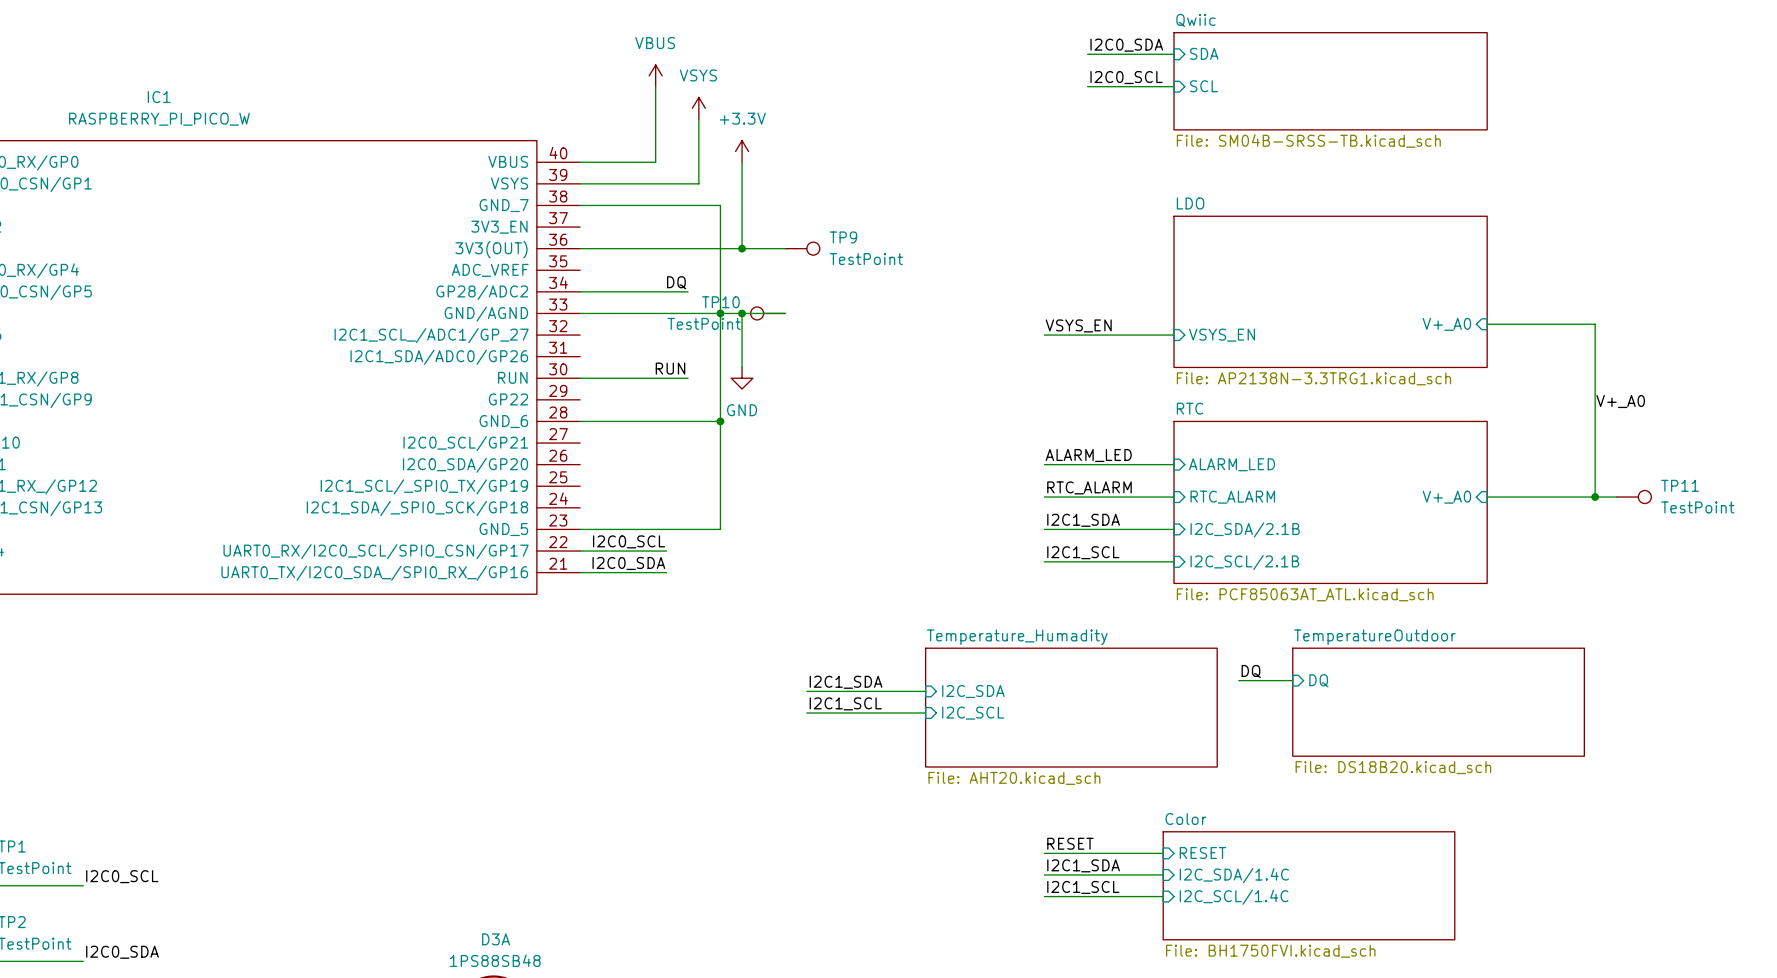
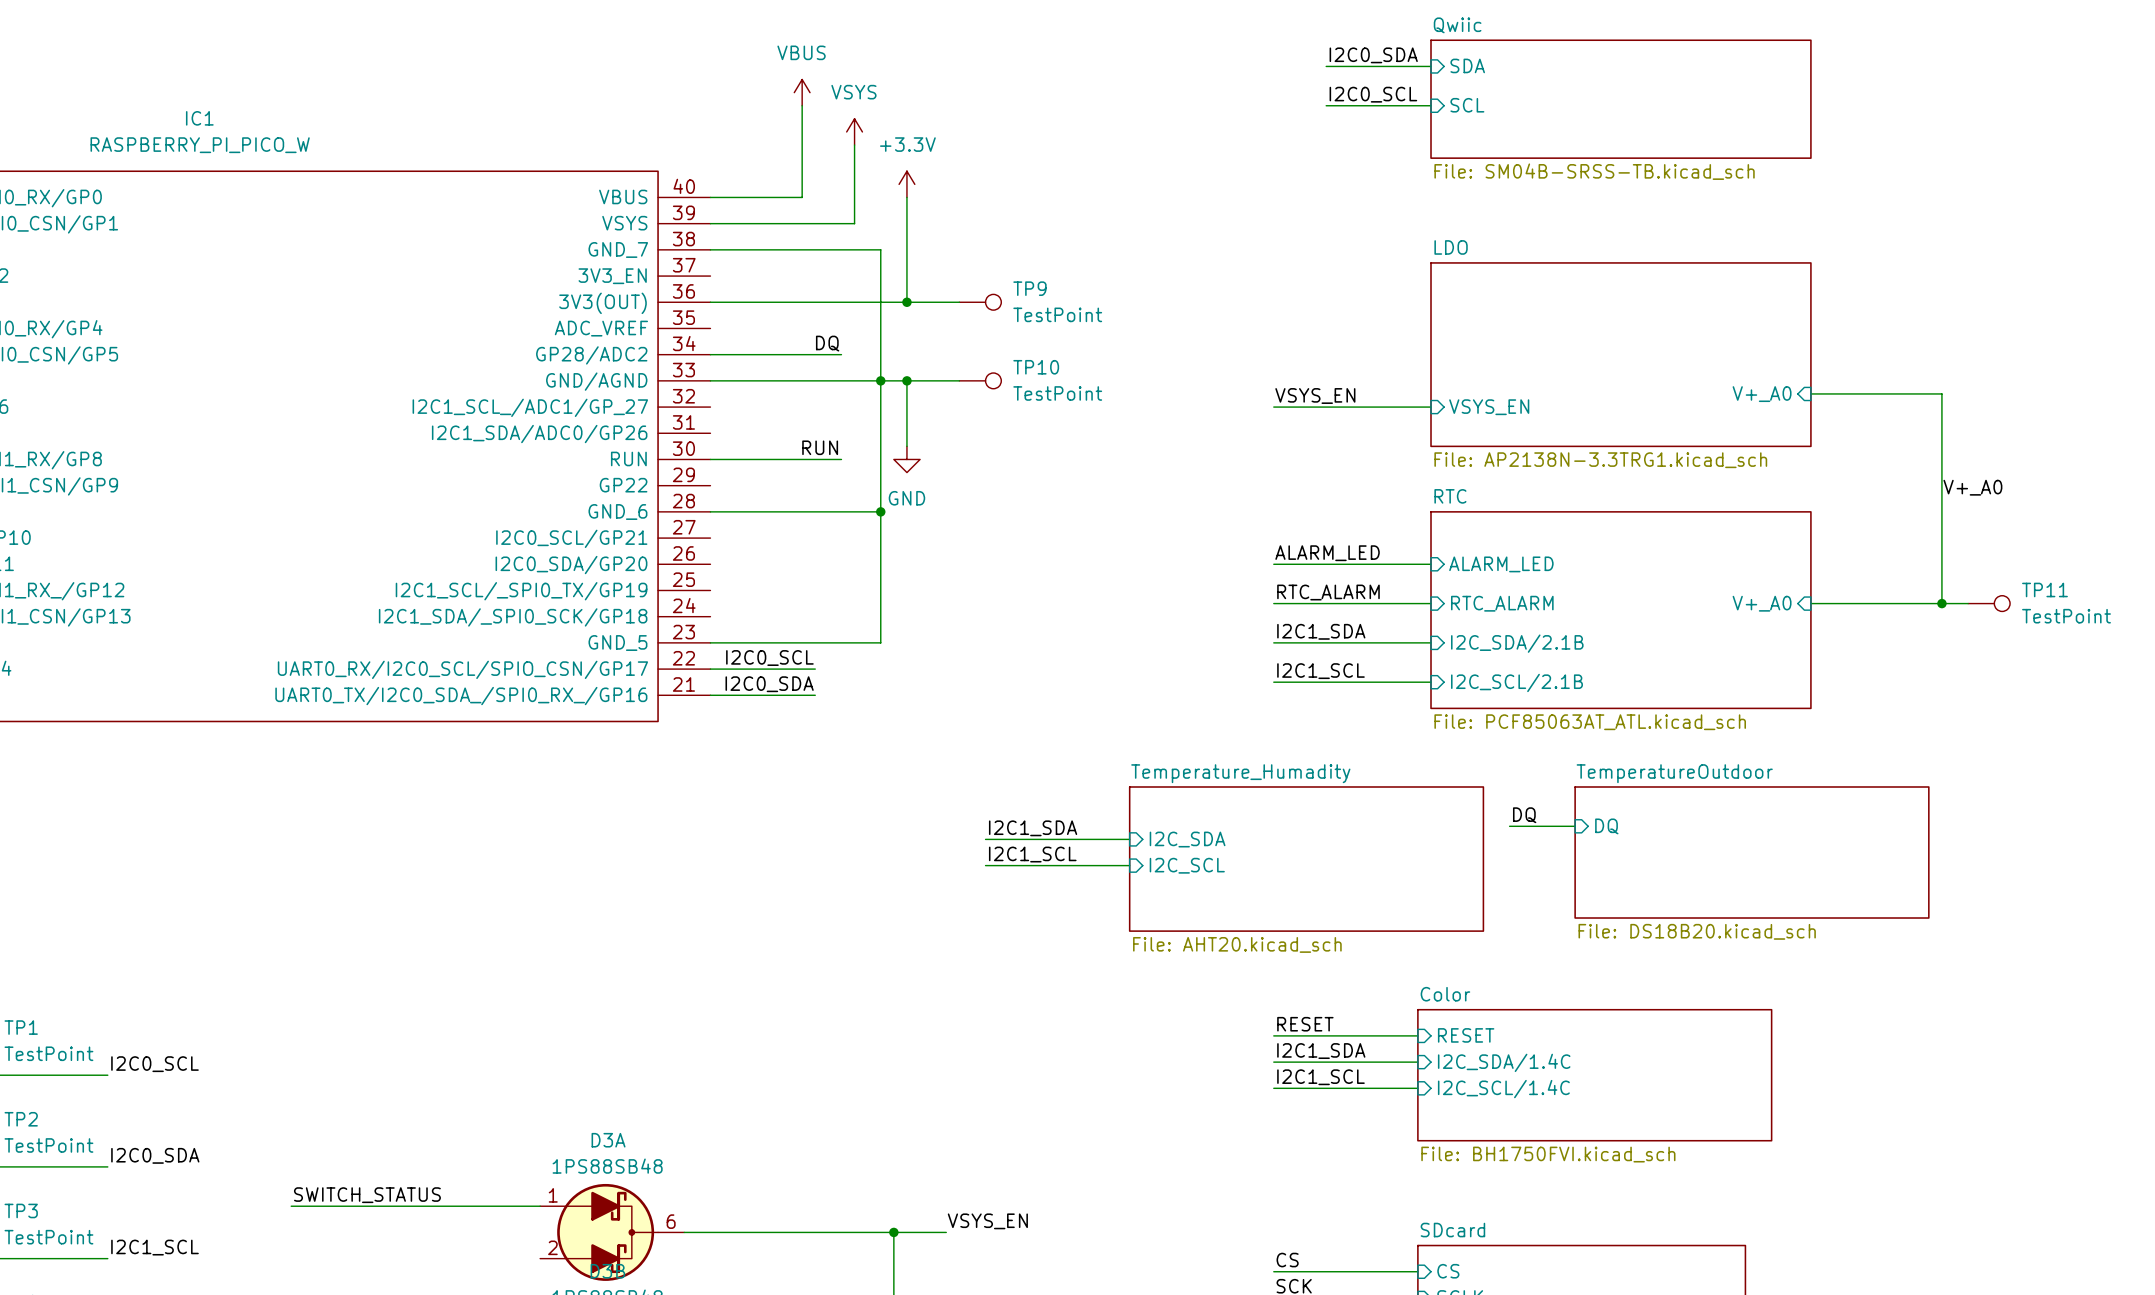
TP10 name position: TP10 (720, 302) -> TP10 (1036, 367)
TP10 rotation: 0° (757, 313) -> 180° (993, 380)
TP10 position: (767, 313) -> (980, 380)
TP10 value position: TestPoint (704, 323) -> TestPoint (1057, 393)

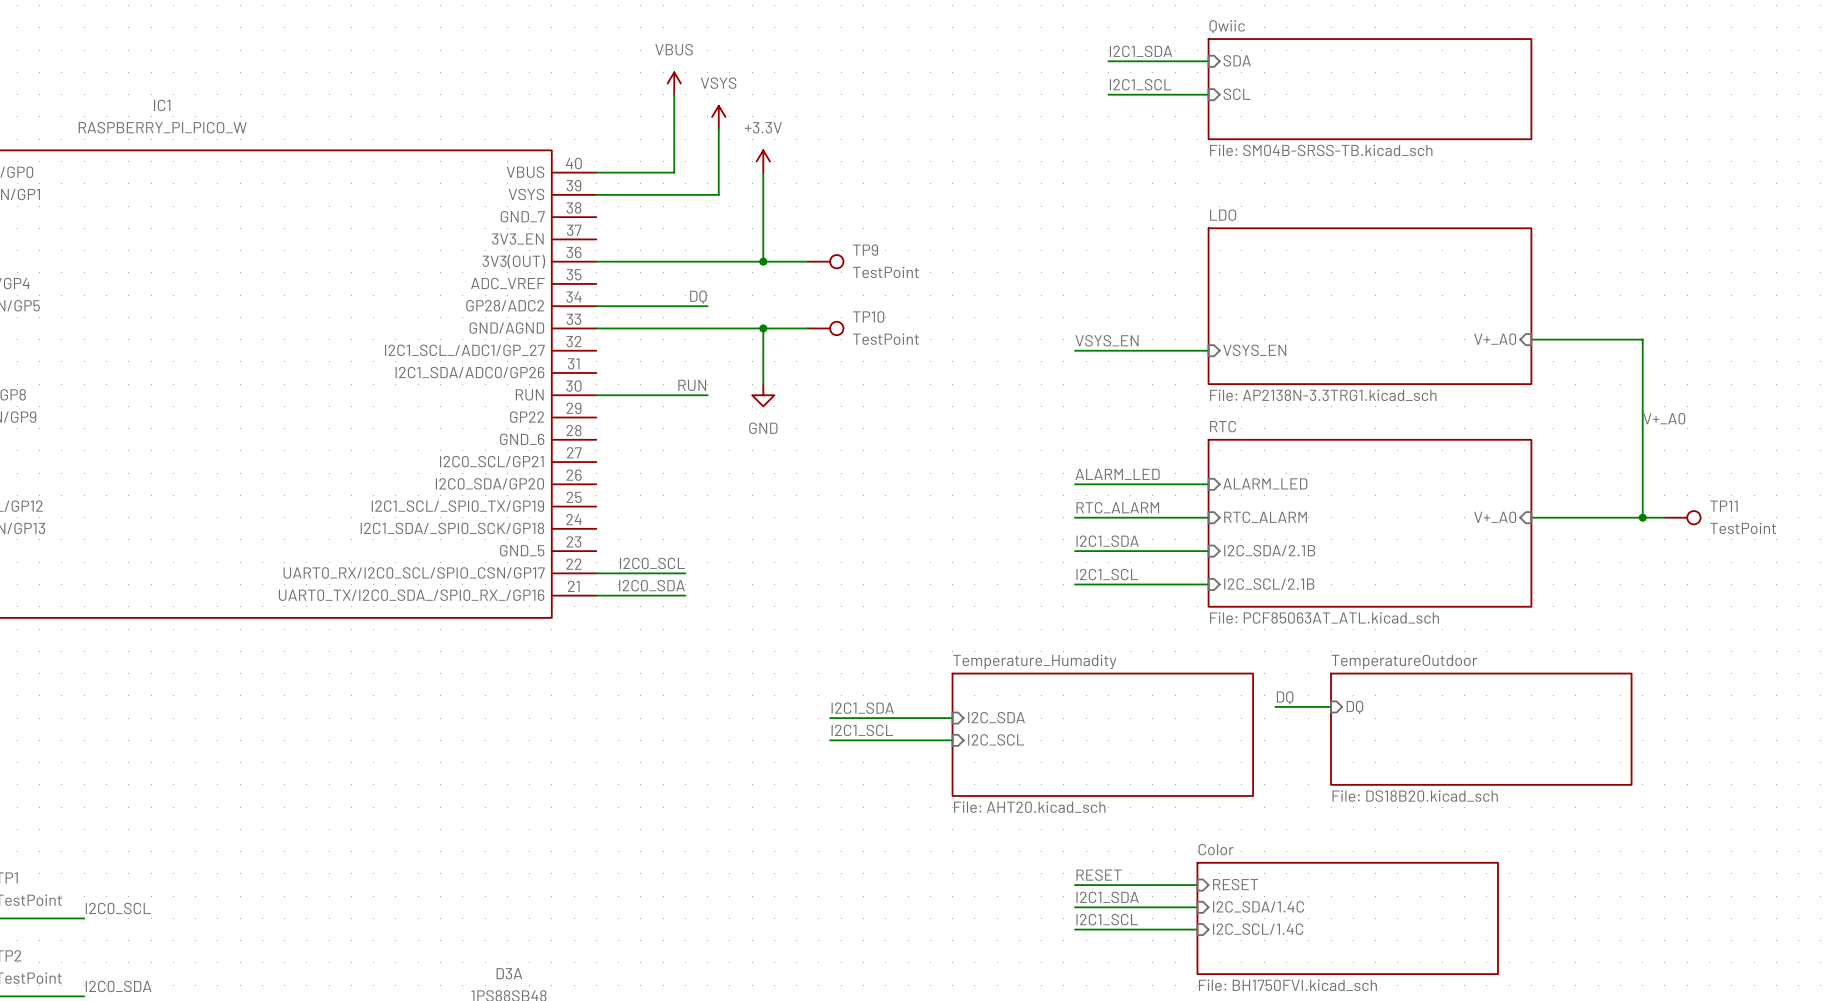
label: I2C0_SDA (1373, 55) -> I2C1_SDA (1141, 51)
wire: none -> (1108, 61) (1119, 61)
label: I2C0_SCL (1373, 94) -> I2C1_SCL (1140, 84)
wire: none -> (1108, 94) (1119, 94)
wire: (710, 249) (880, 249) (880, 642) (710, 642) -> none
junction: (880, 380) -> none
wire: (710, 511) (880, 511) -> none
junction: (880, 511) -> none

